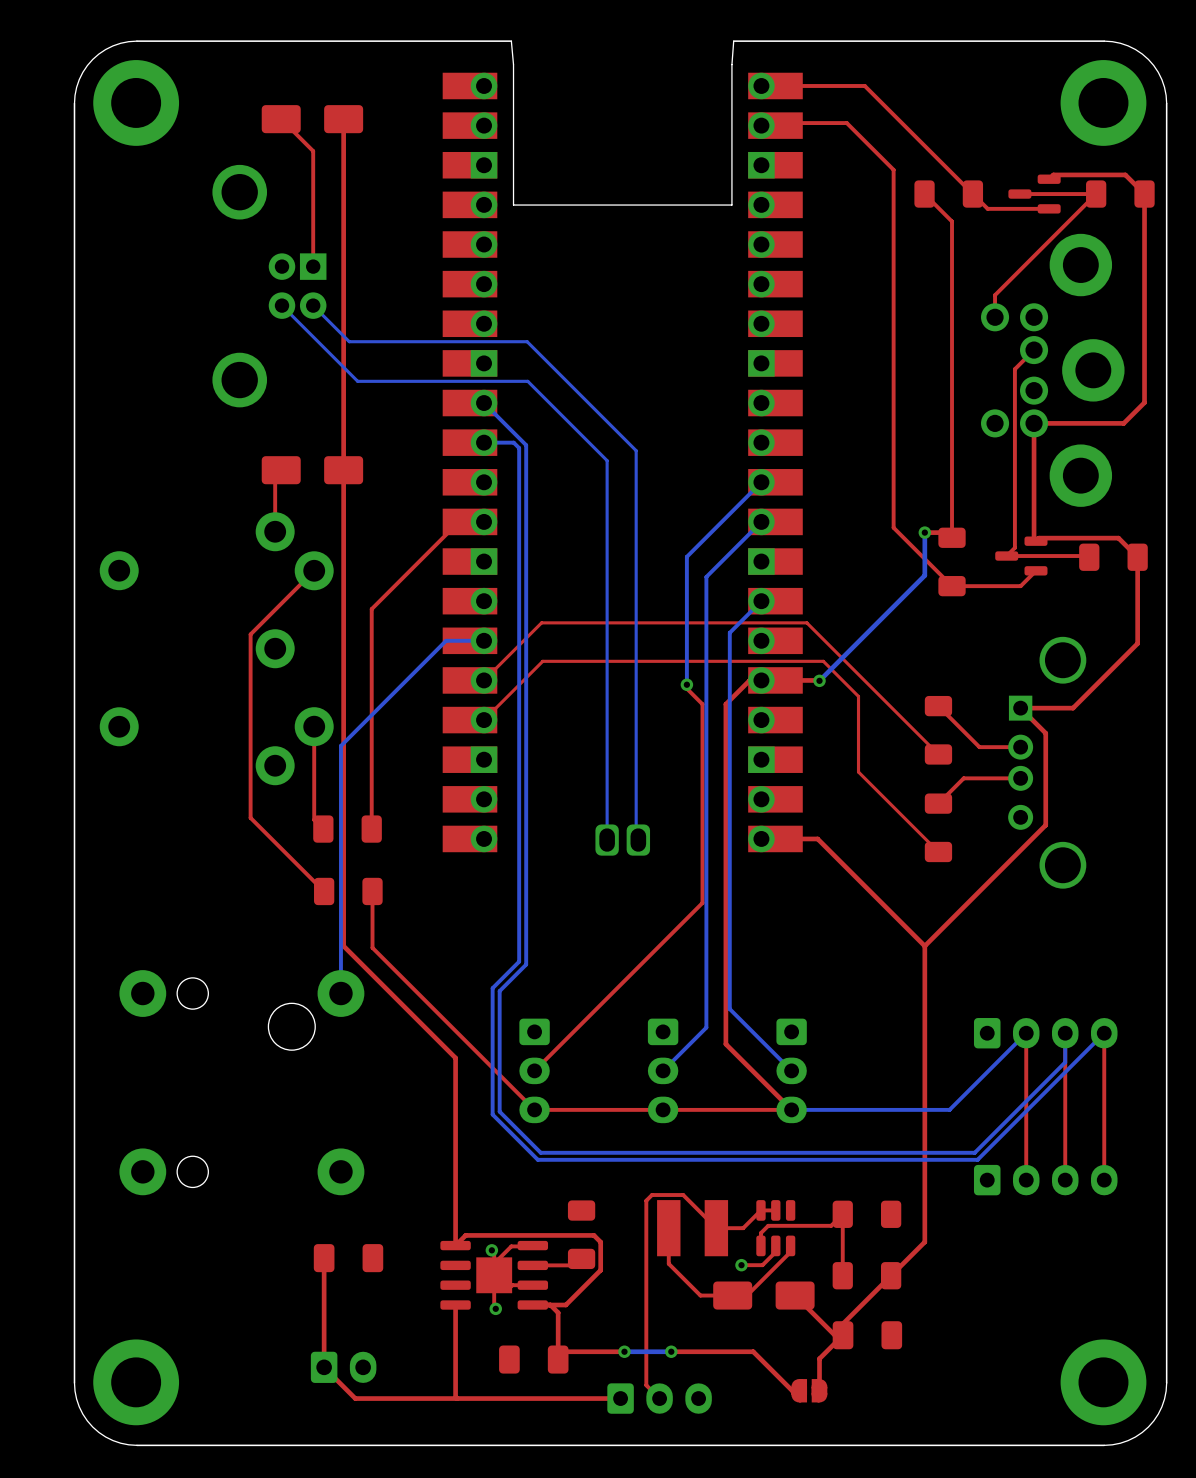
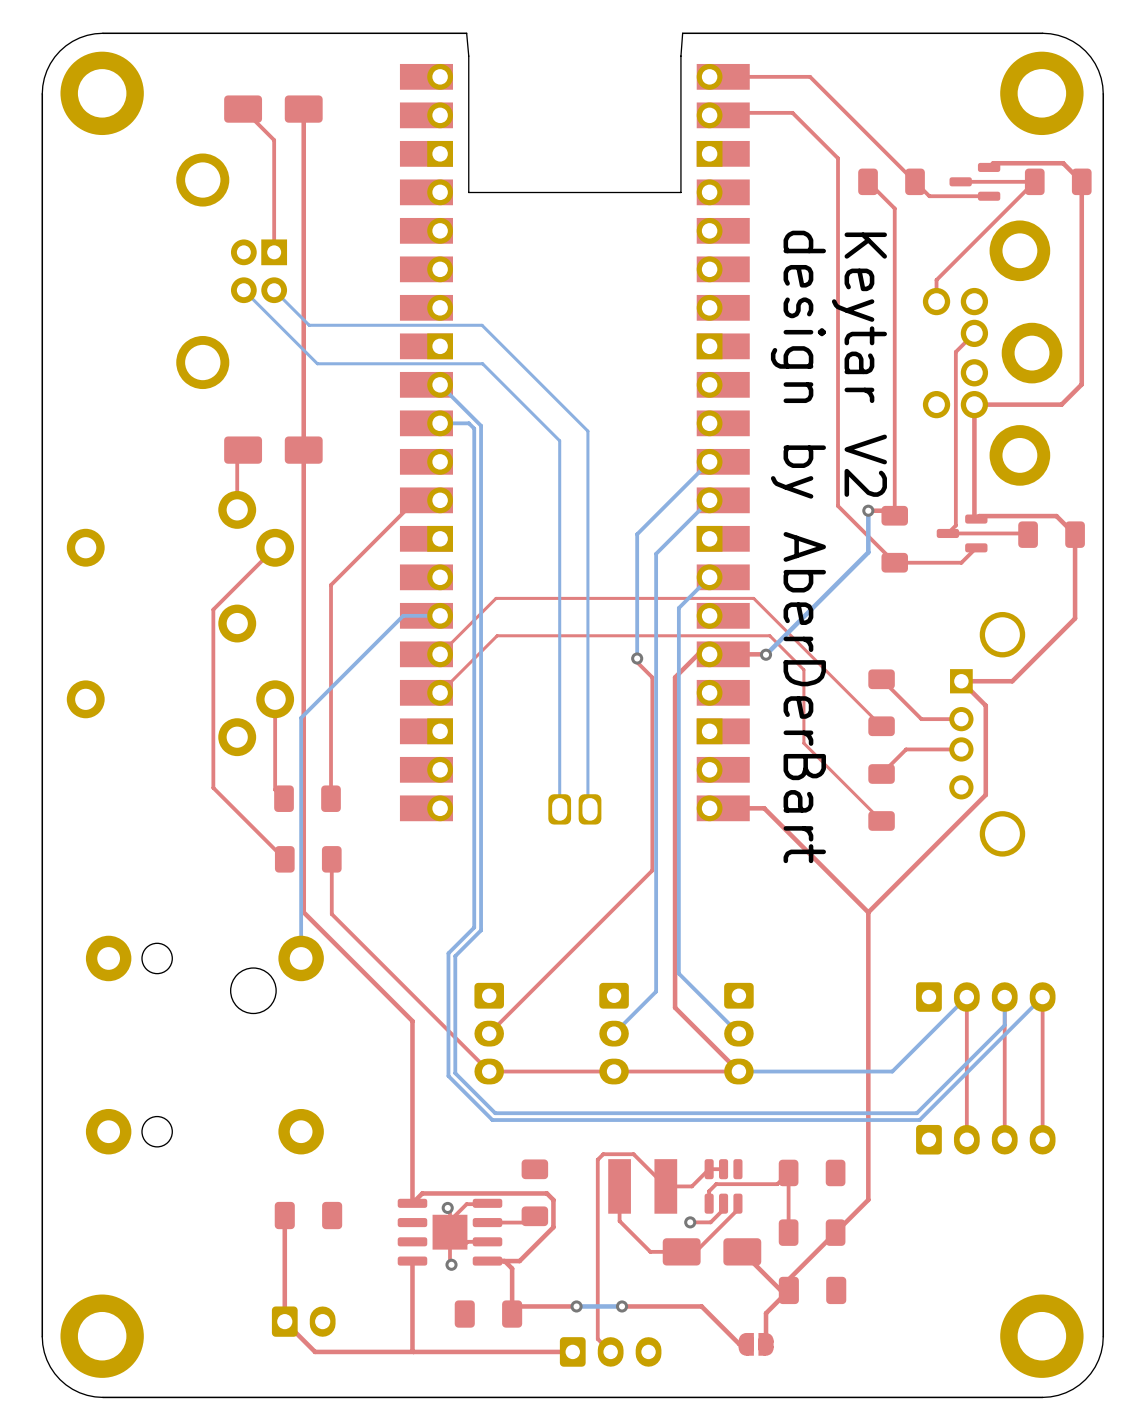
text: none -> Keytar V2 (859, 364)
text: none -> design by AberDerBart (798, 546)

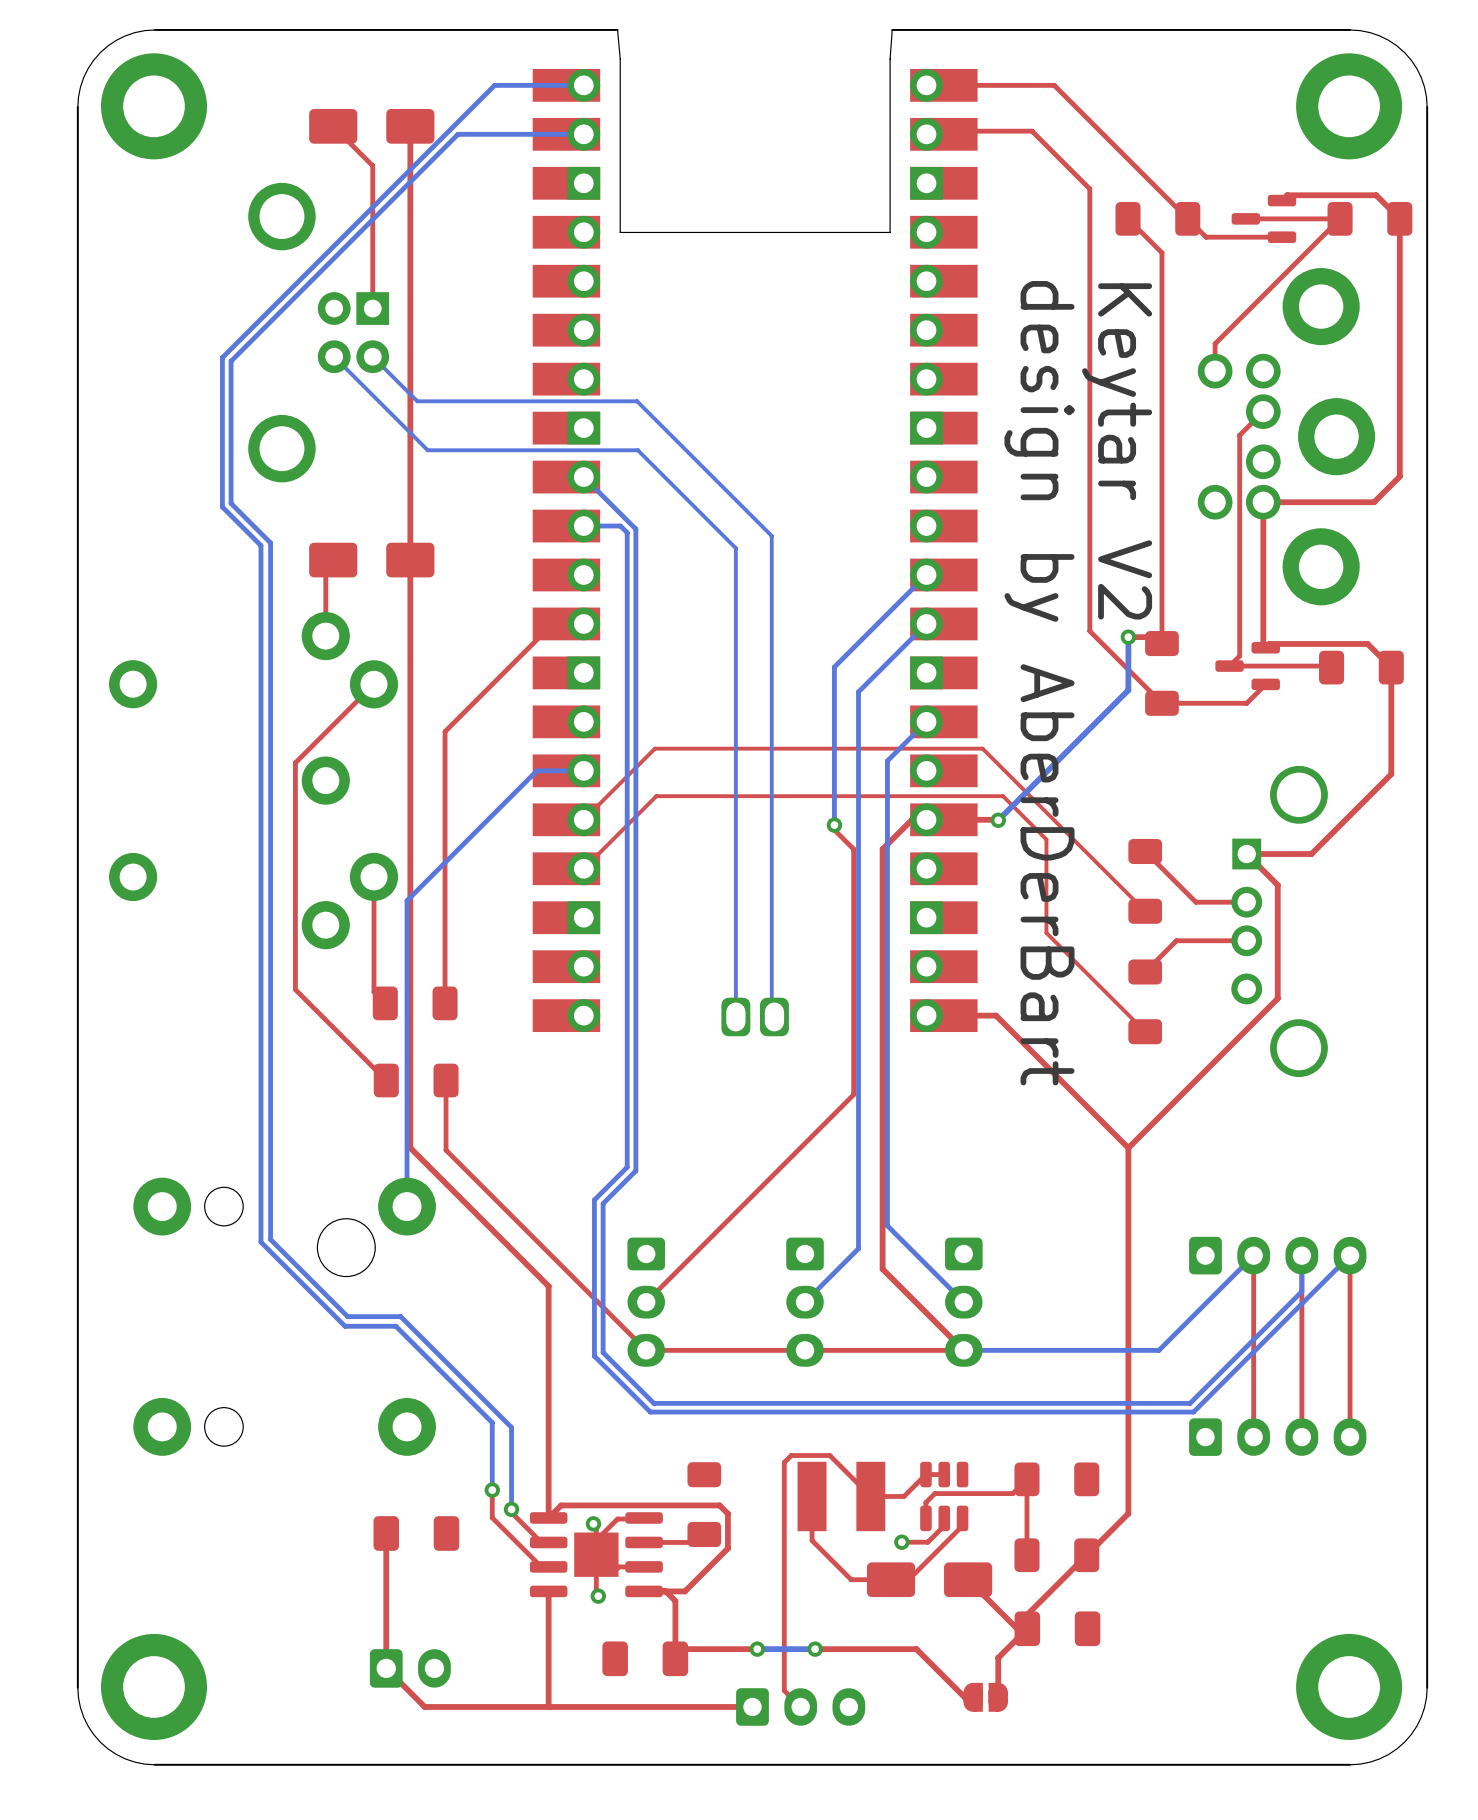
bottom track: none -> (583, 85) (494, 85) (222, 357) (222, 507) (260, 545) (260, 1242) (345, 1326) (395, 1326) (492, 1422) (492, 1490)
bottom track: none -> (583, 134) (457, 134) (231, 361) (231, 503) (270, 542) (270, 1239) (347, 1316) (400, 1316) (511, 1427) (511, 1509)
top track: none -> (492, 1490) (492, 1517) (541, 1566) (548, 1566)
via: none -> (492, 1490)
top track: none -> (511, 1509) (511, 1512) (541, 1542) (548, 1542)
via: none -> (511, 1509)

